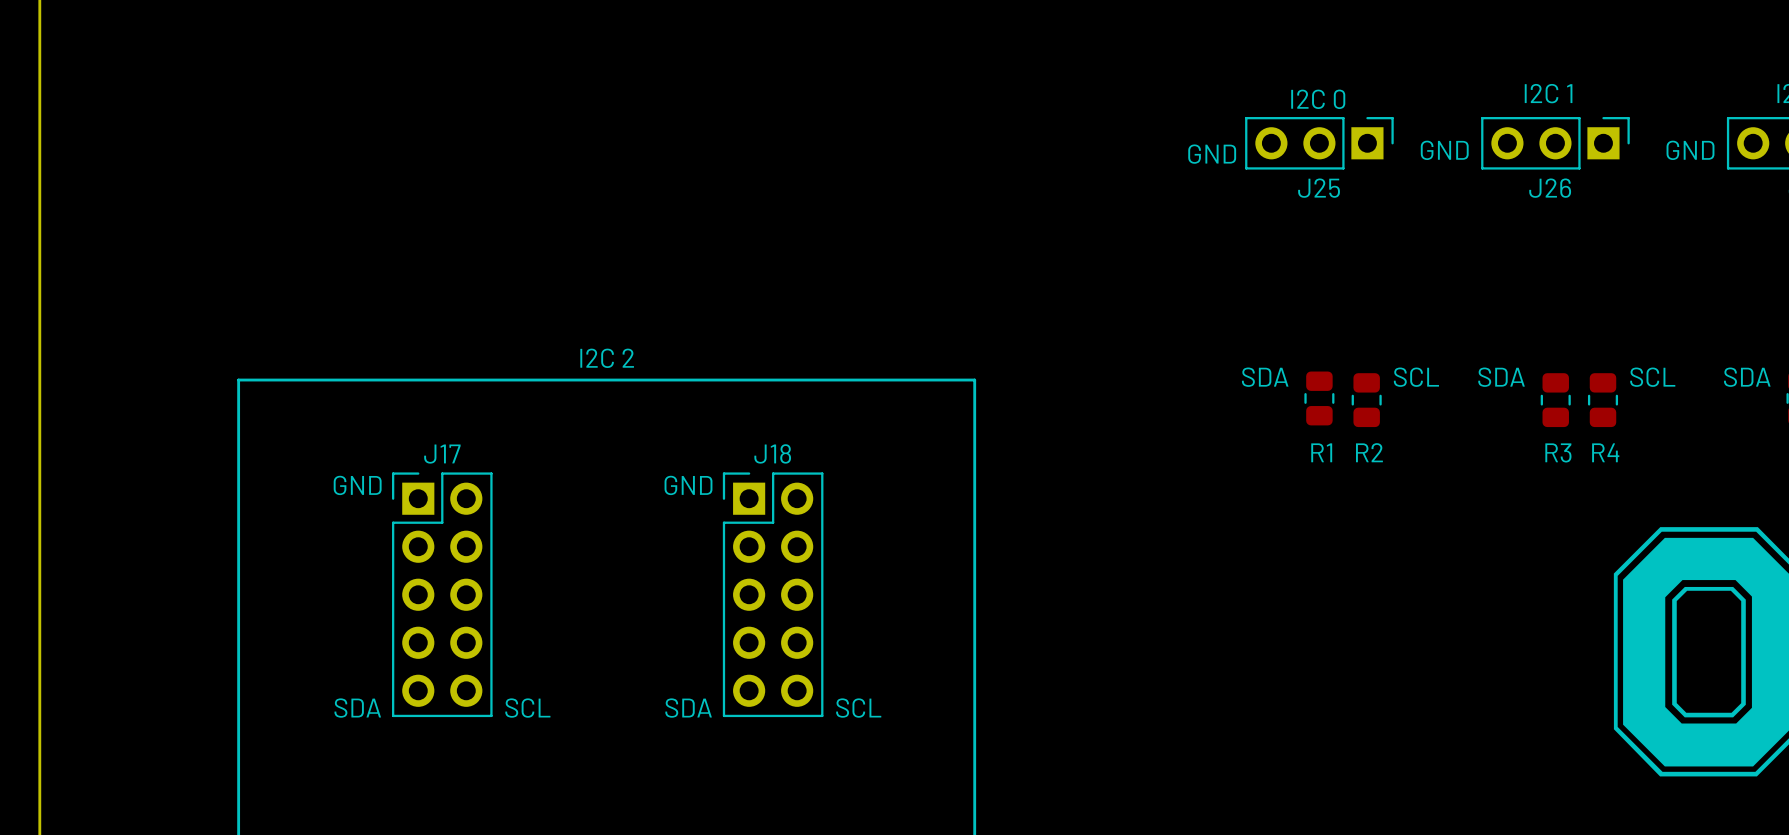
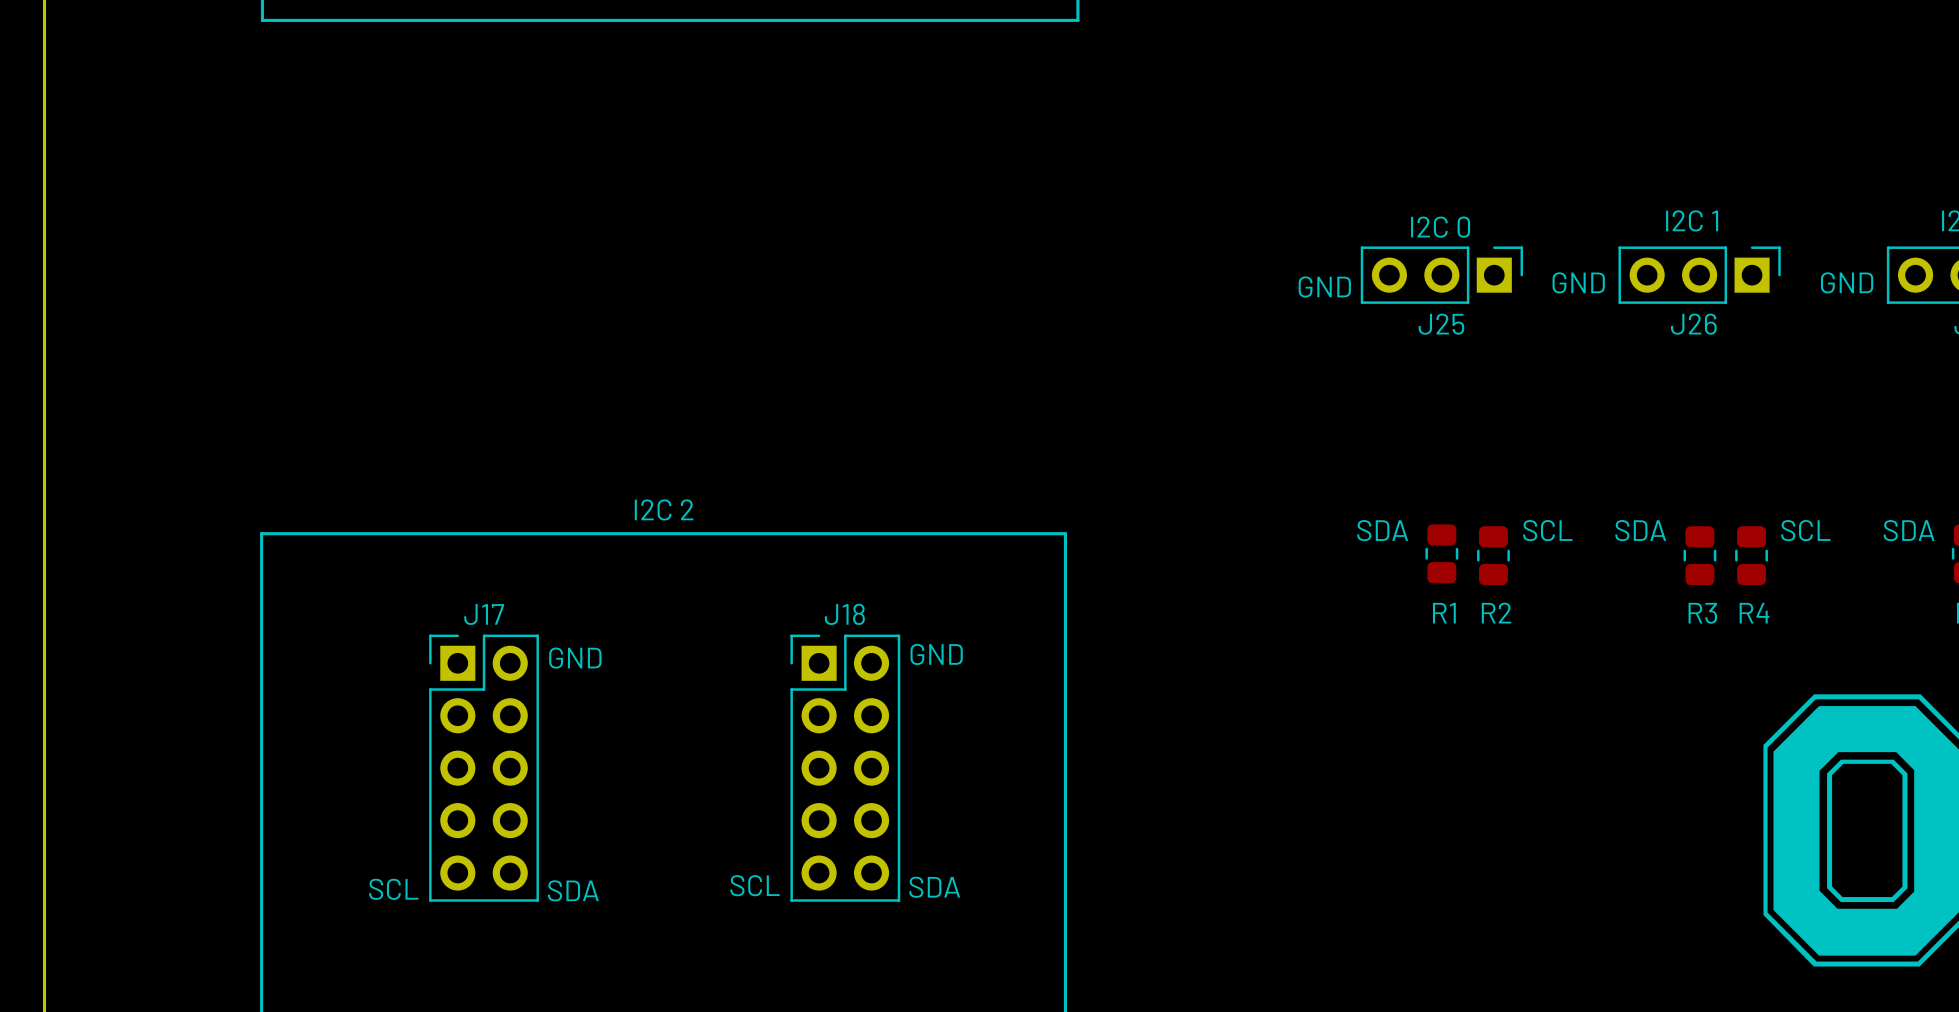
text: GND (357, 485) -> none
text: GND (688, 485) -> none
text: none -> GND (936, 654)
text: none -> GND (575, 658)
text: SDA (357, 708) -> SCL (393, 889)
text: SCL (527, 708) -> SDA (573, 890)
text: SDA (688, 708) -> SCL (755, 885)
text: SCL (858, 708) -> SDA (934, 887)

